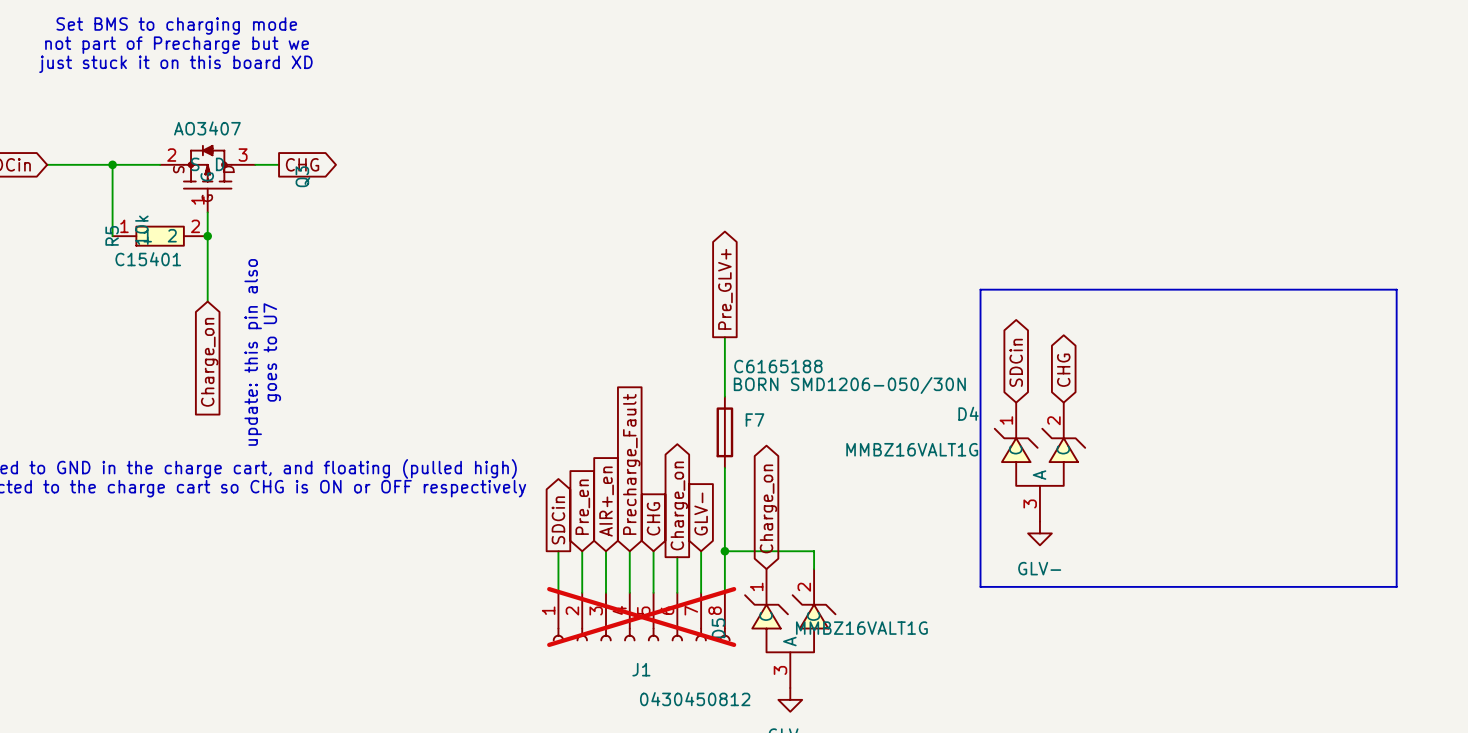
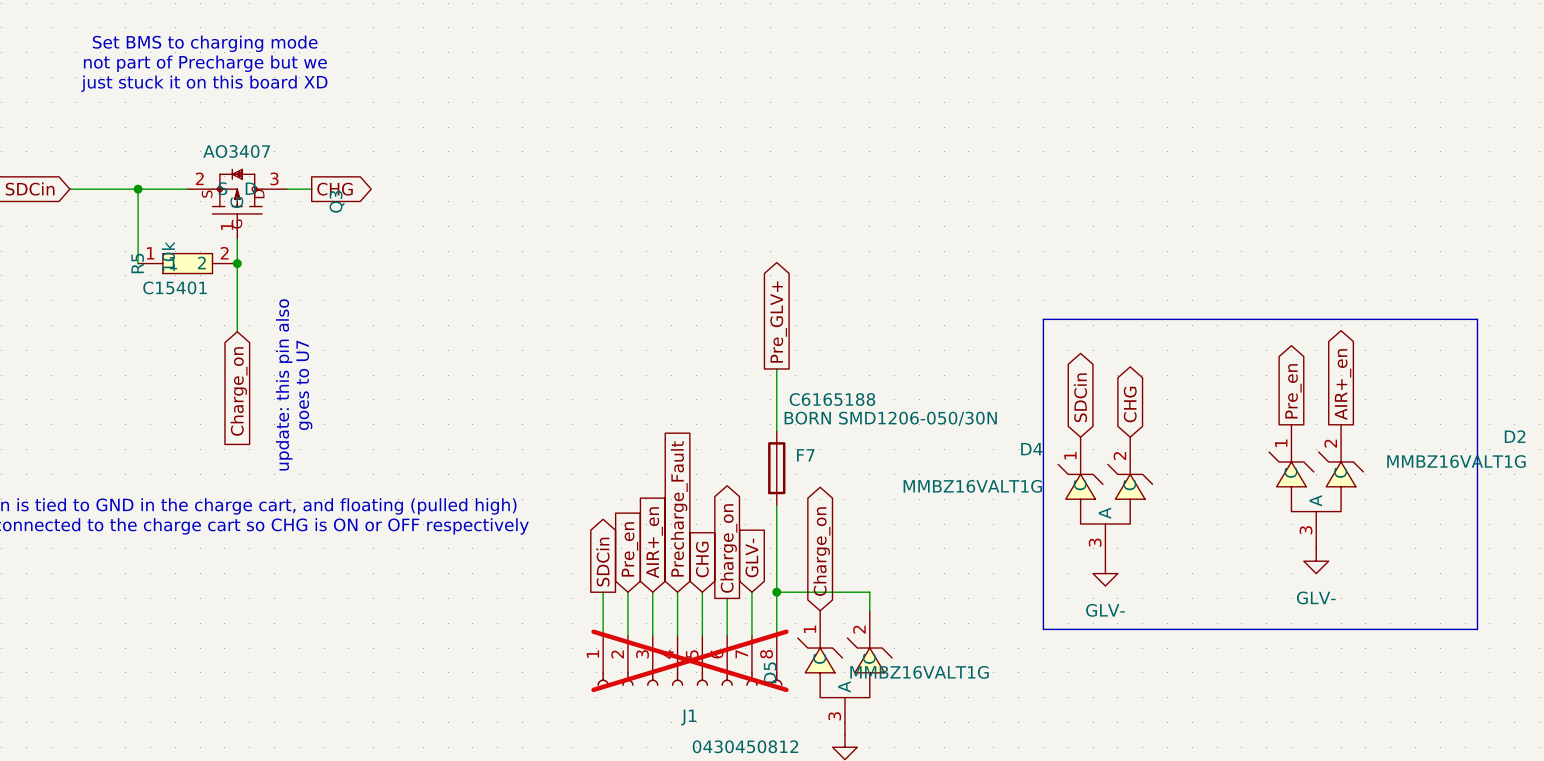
global label: none -> AIR+_en (1343, 384)
global label: none -> Pre_en (1293, 391)
D2: none -> MMBZ16VALT1G (1316, 486)
power symbol: none -> GLV- (1316, 561)

